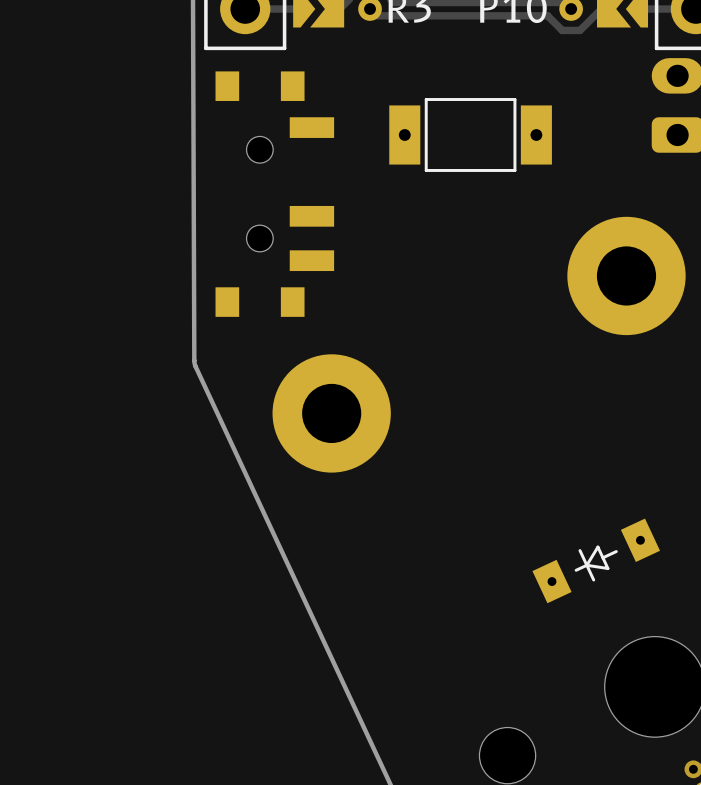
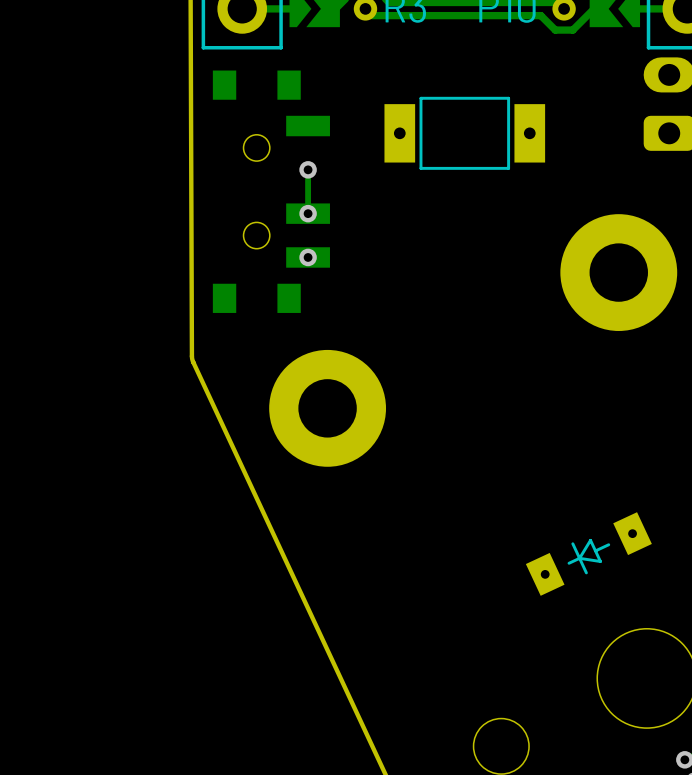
track: none -> (308, 169) (308, 213)
via: none -> (308, 169)
via: none -> (308, 213)
via: none -> (308, 257)

